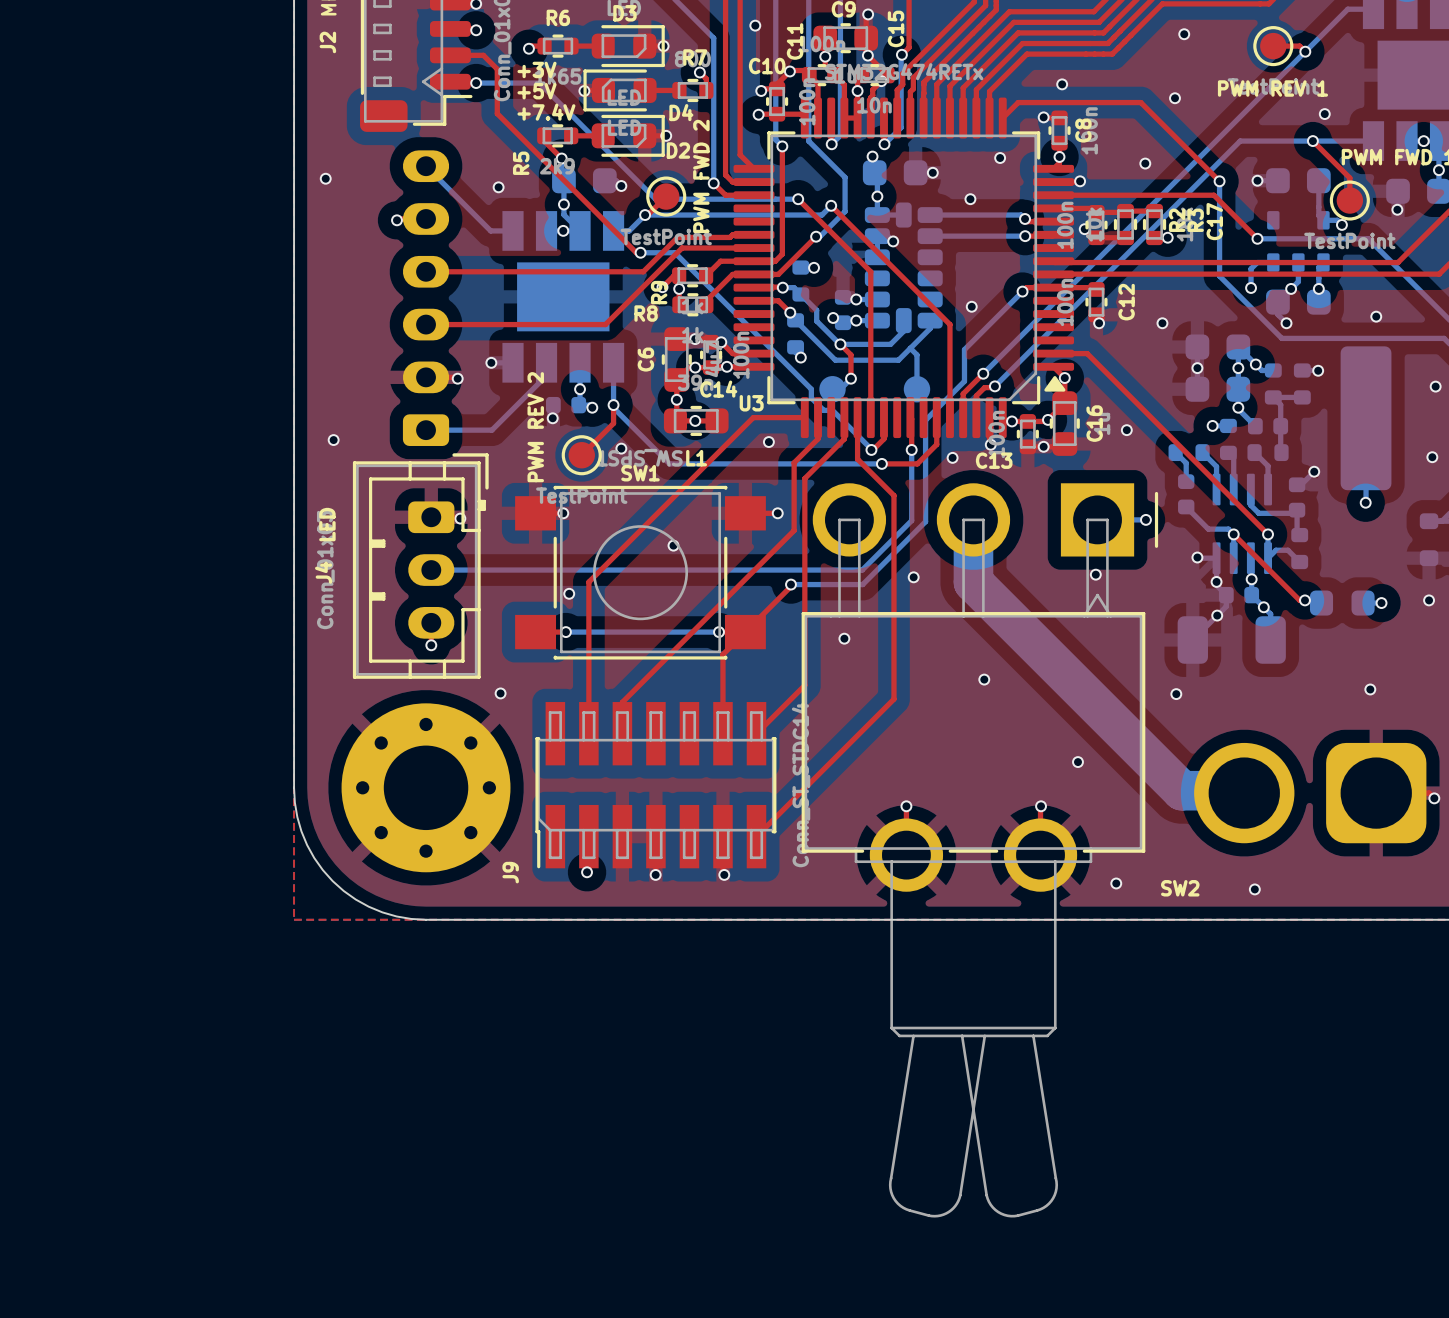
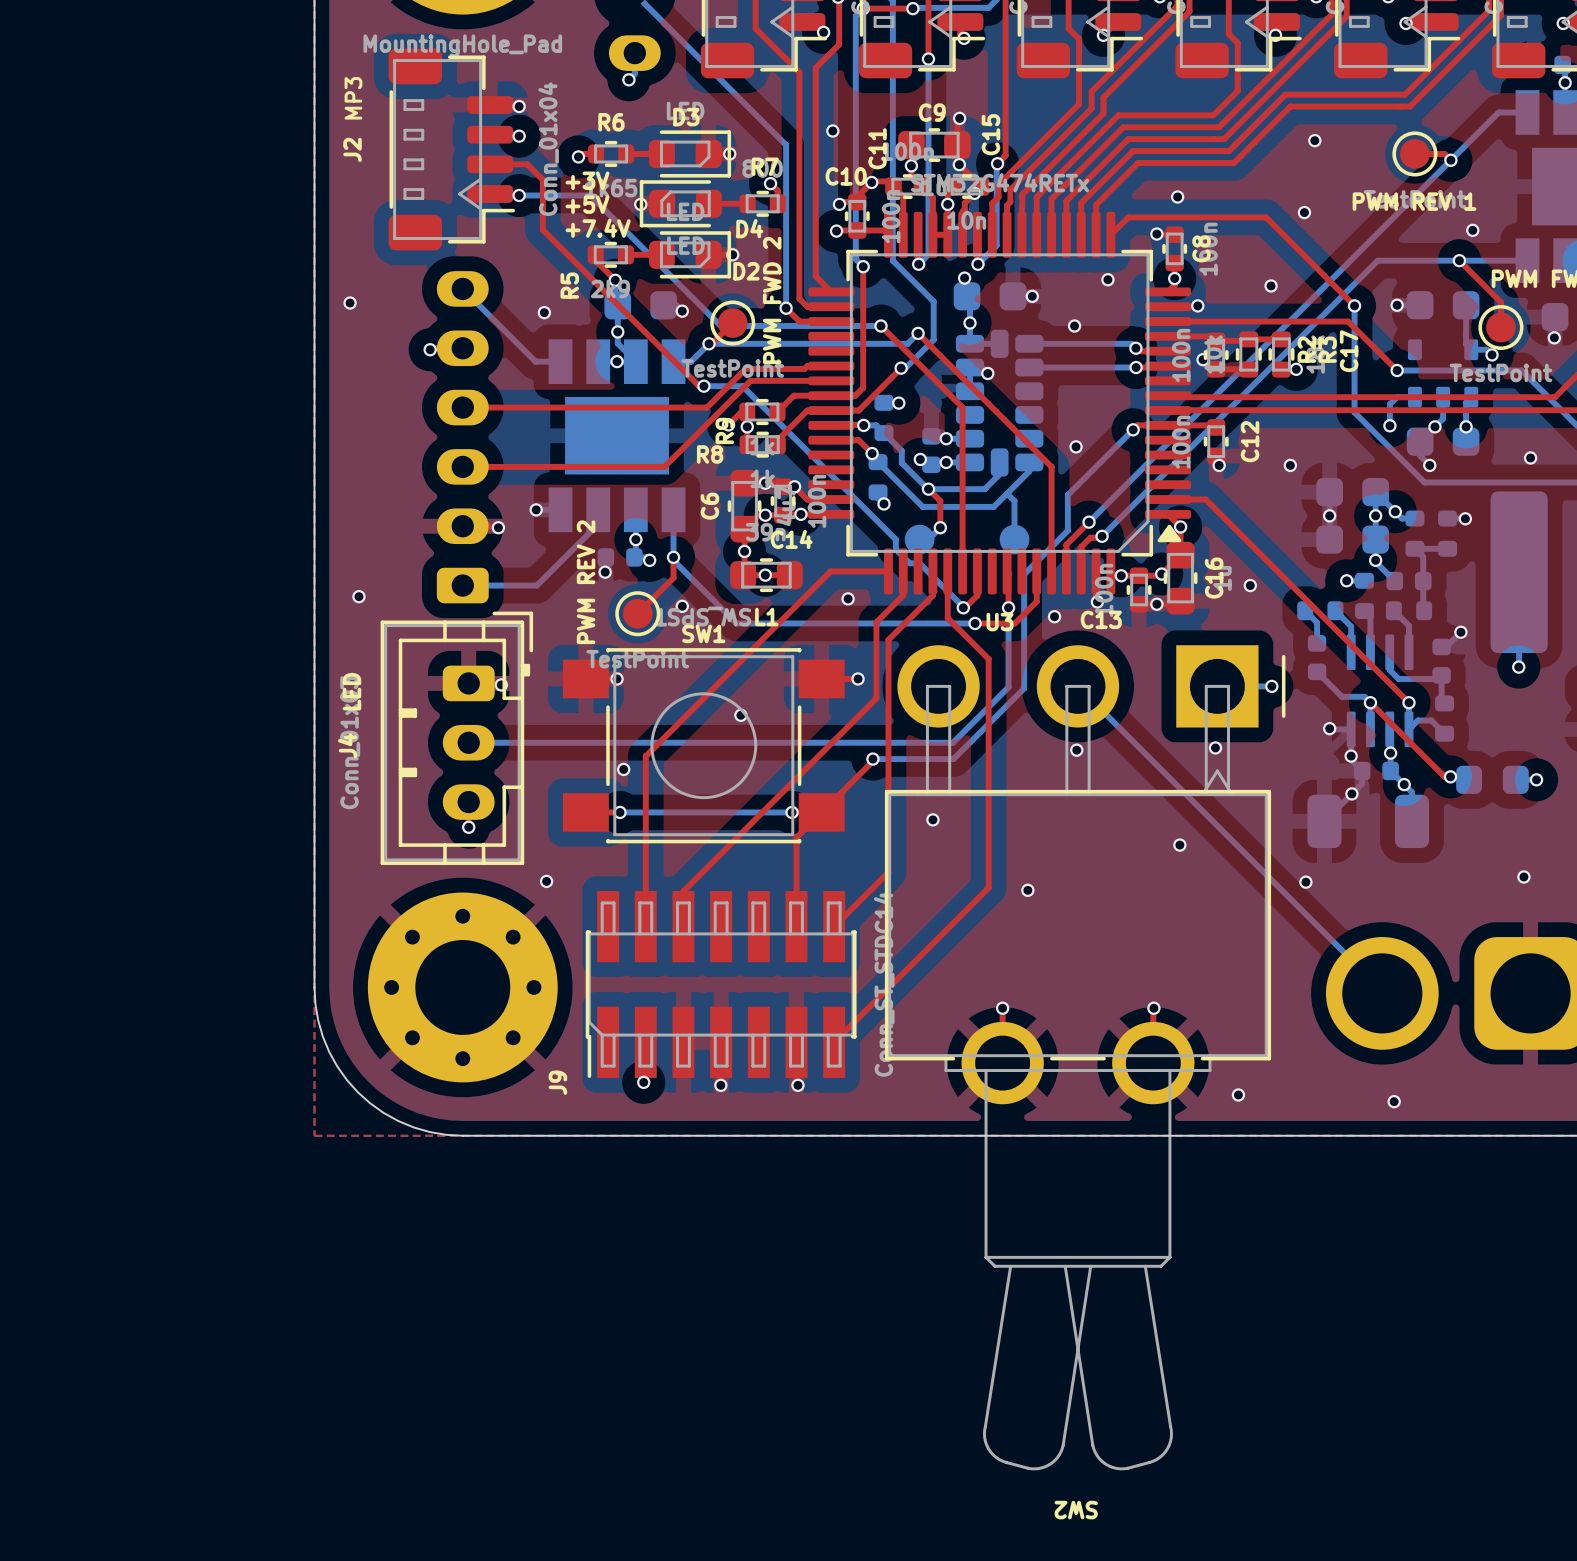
U3 name position: U3 (751, 403) -> U3 (1000, 622)
bottom track: (973, 519) (973, 582) (1181, 790) (1244, 790) -> (1077, 686) (1382, 990)
via: none -> (1076, 750)
via: (913, 577) -> none
via: none -> (1179, 845)
via: (984, 679) -> none
via: none -> (1027, 890)
via: (1077, 762) -> none
SW2 name rotation: 0° (1180, 888) -> 180° (1076, 1510)
SW2 name position: SW2 (1180, 888) -> SW2 (1076, 1510)

